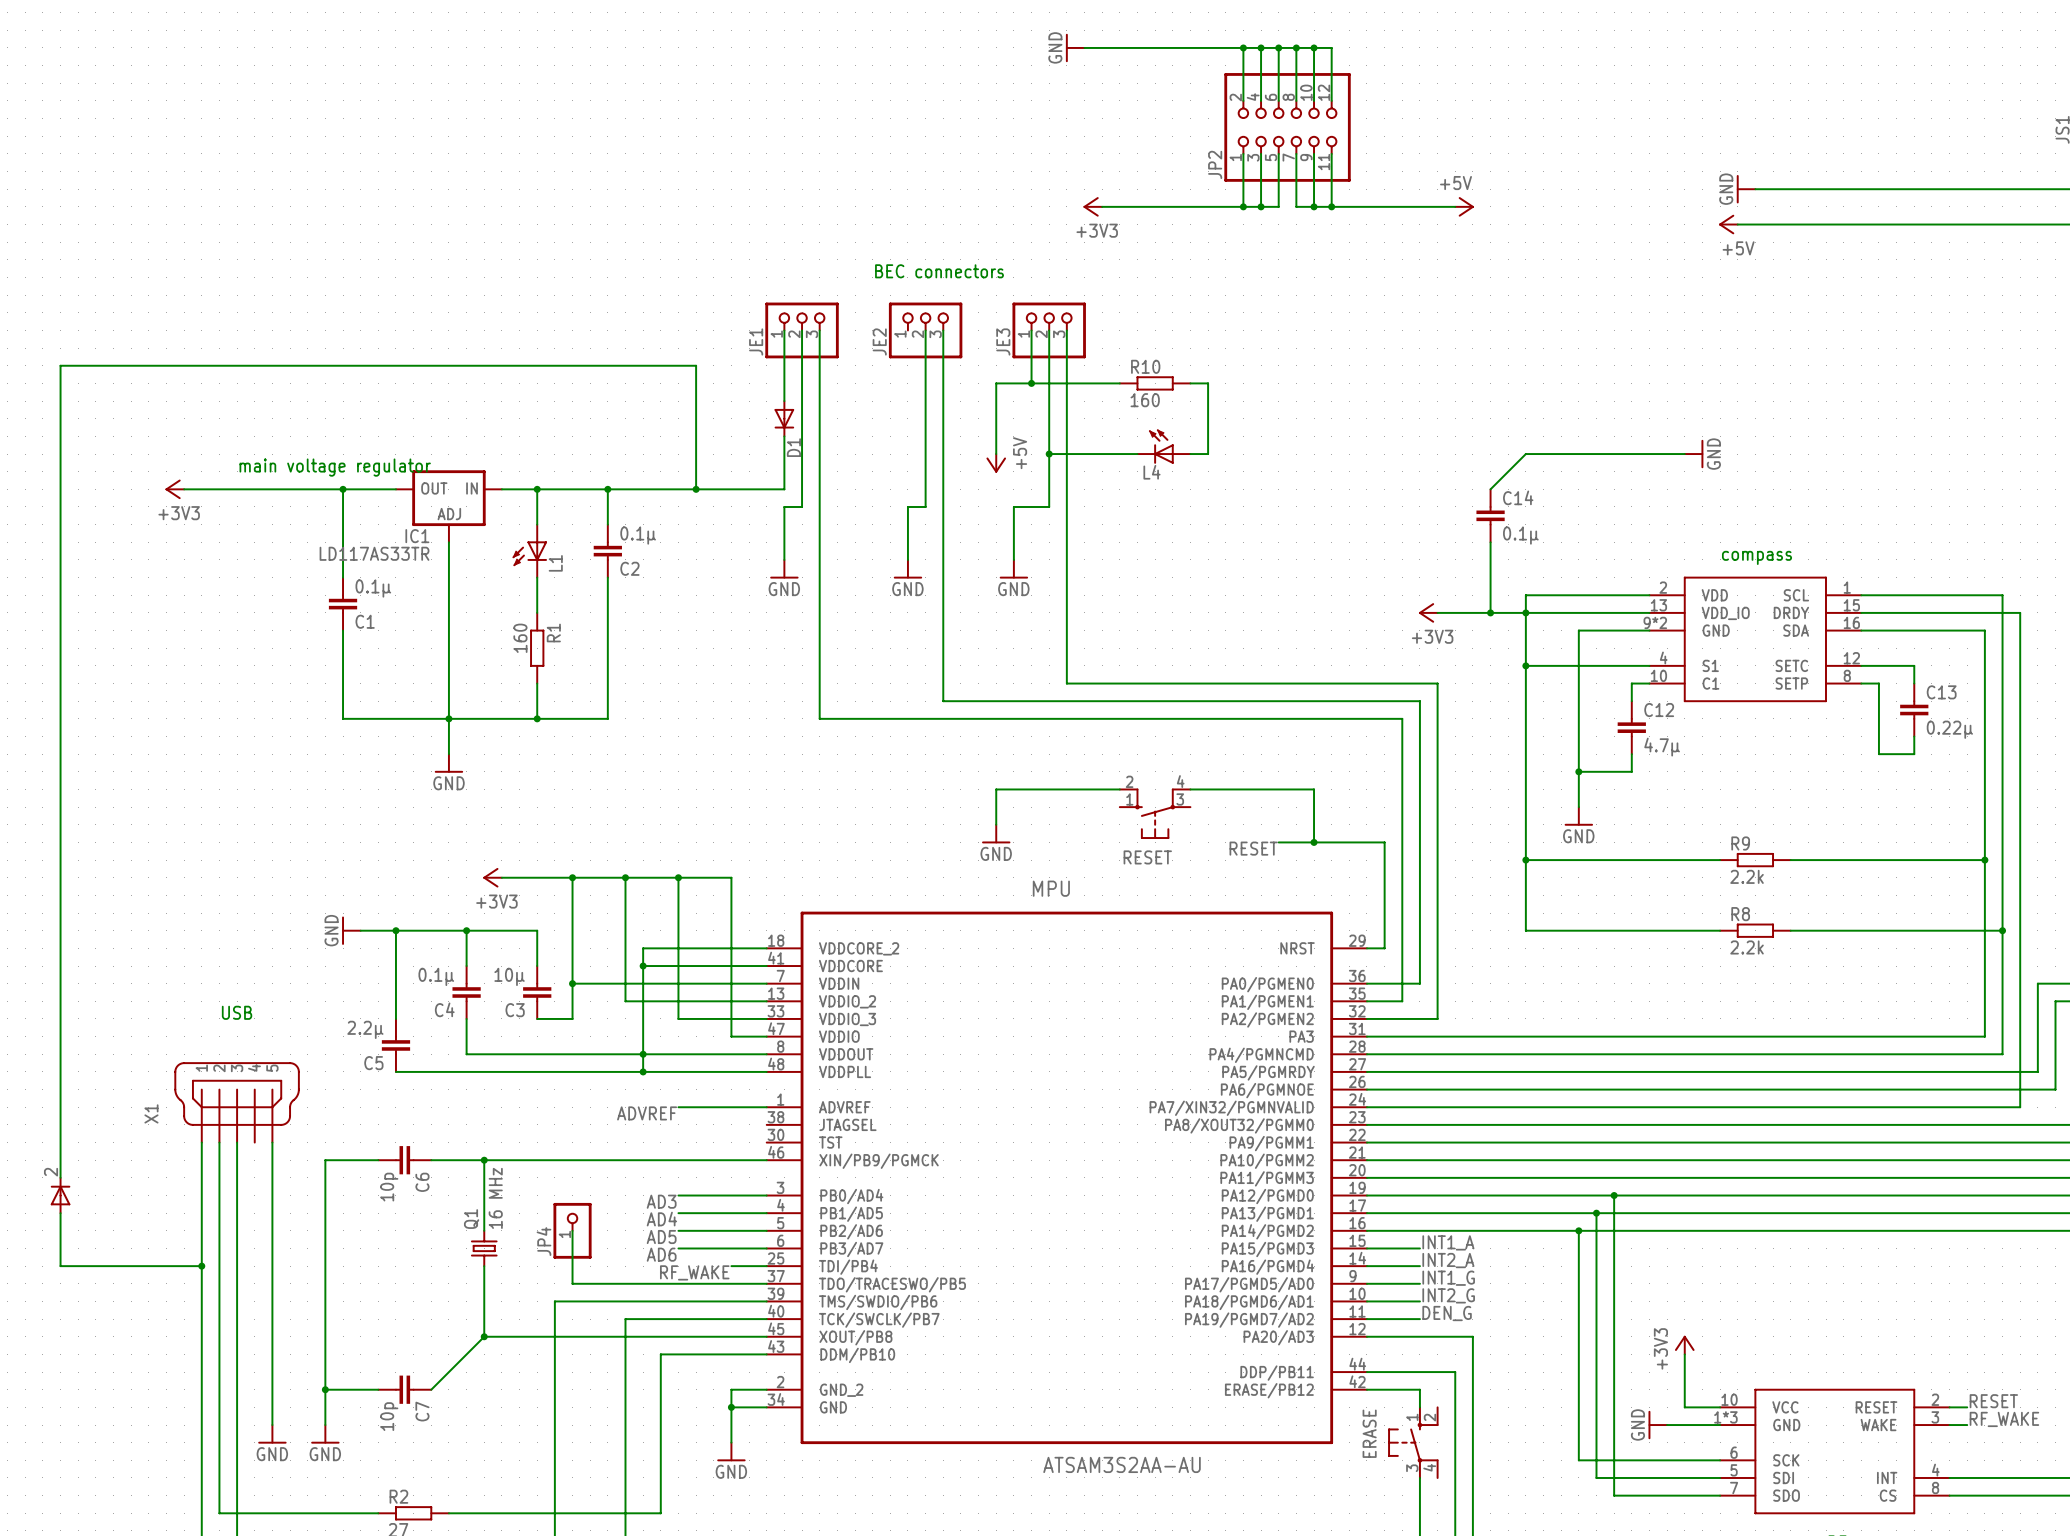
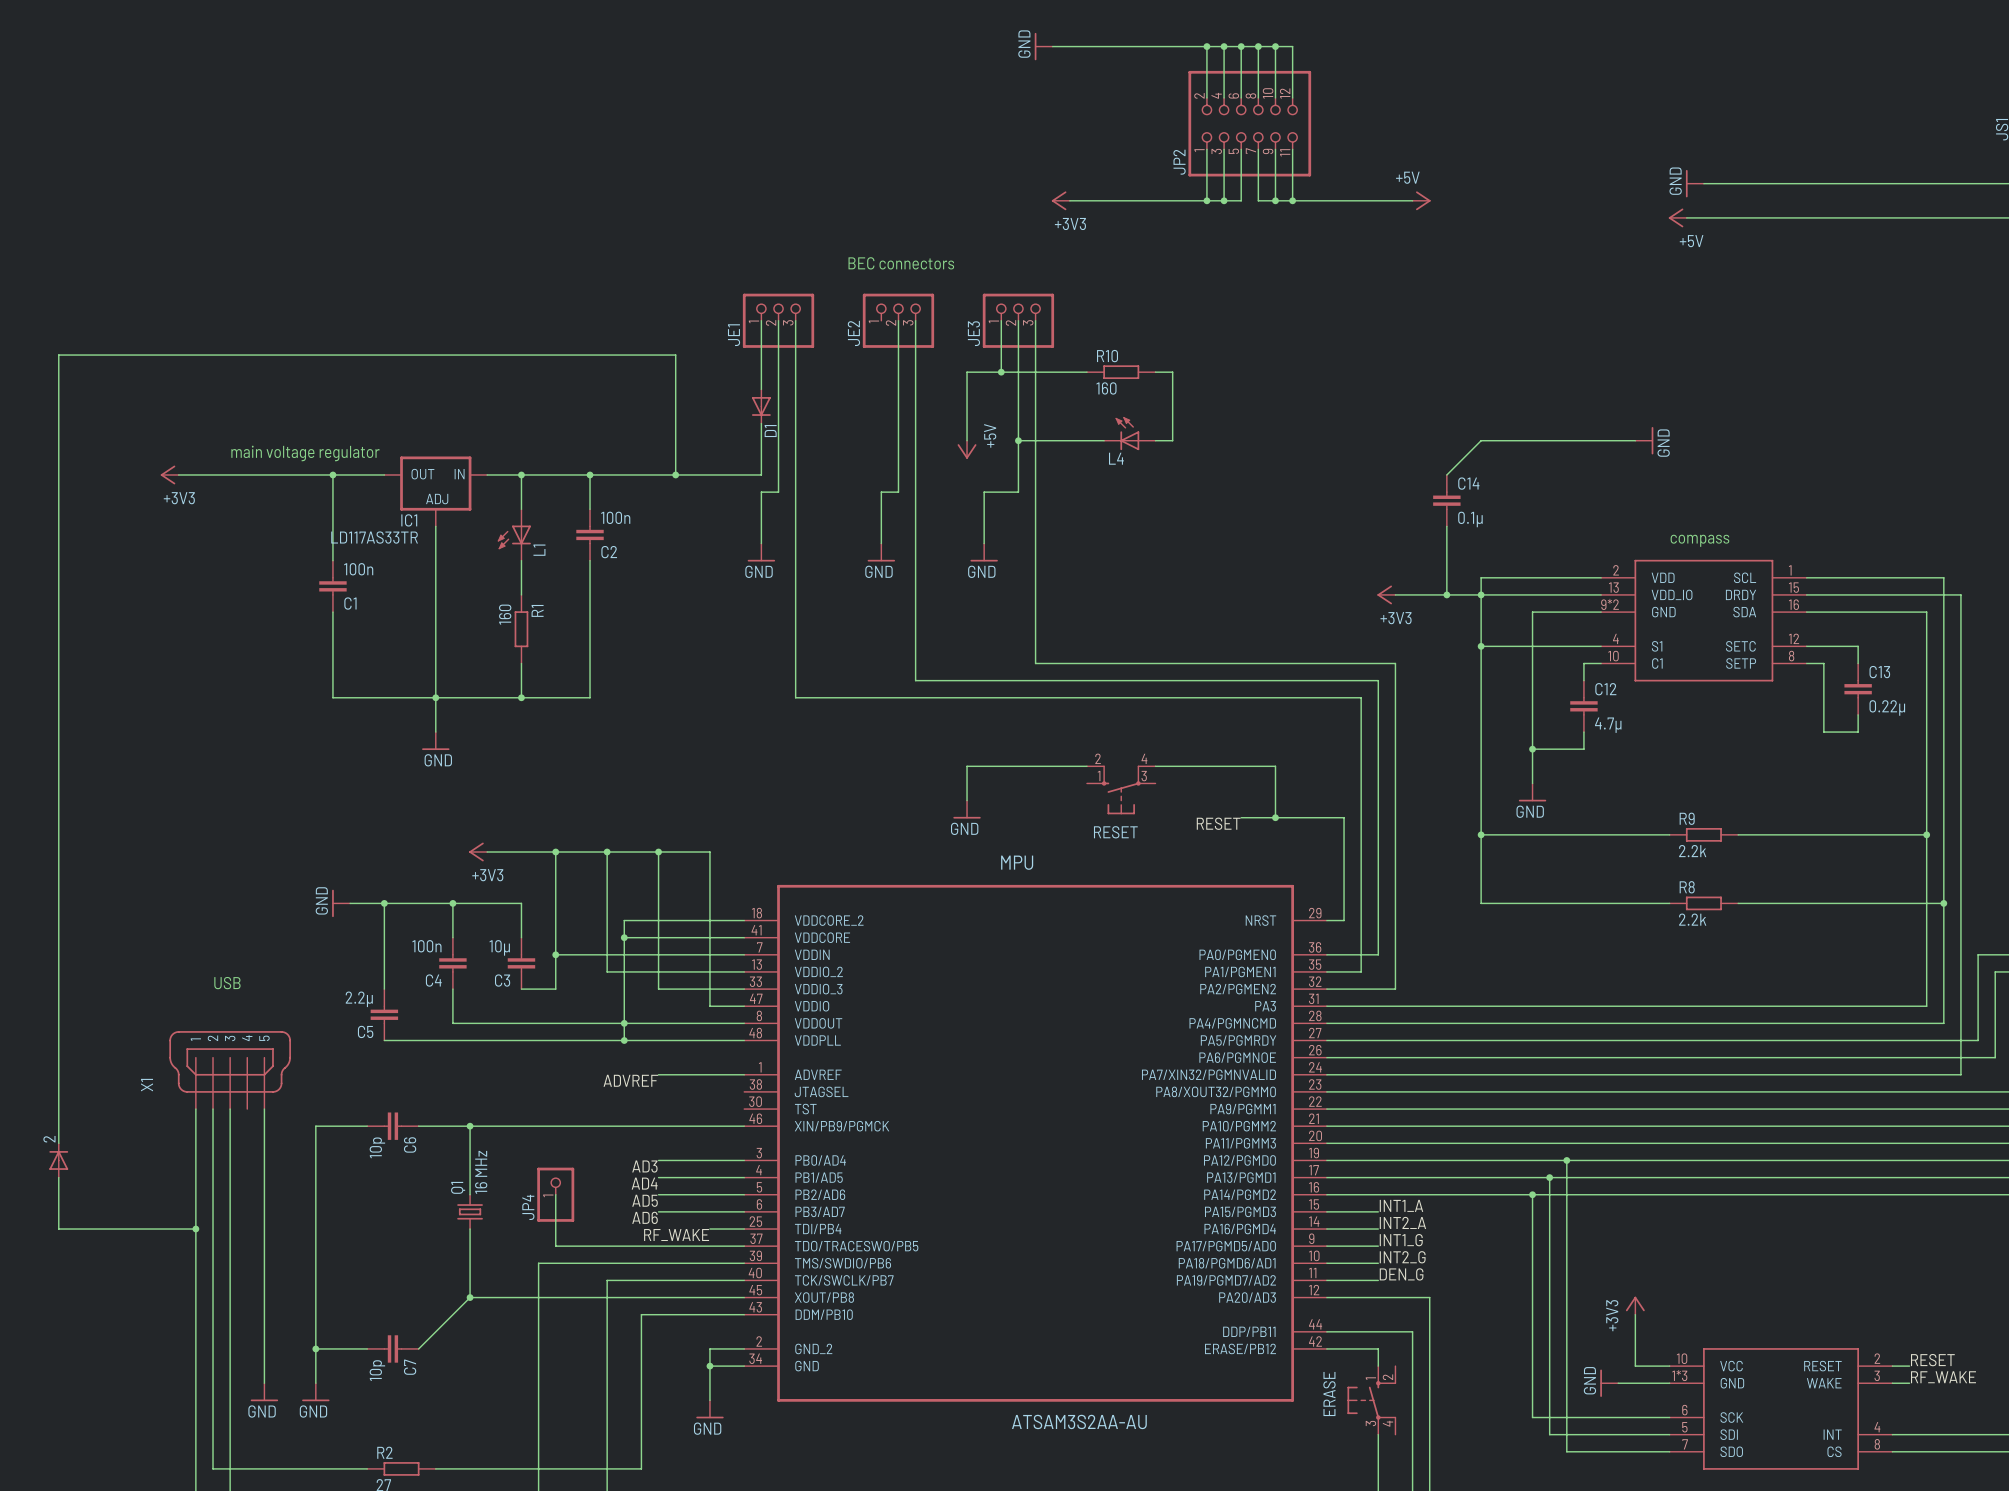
C2 value: 0.1µ (638, 535) -> 100n (615, 517)
C1 value: 0.1µ (373, 588) -> 100n (358, 569)
C4 value: 0.1µ (436, 976) -> 100n (426, 946)

